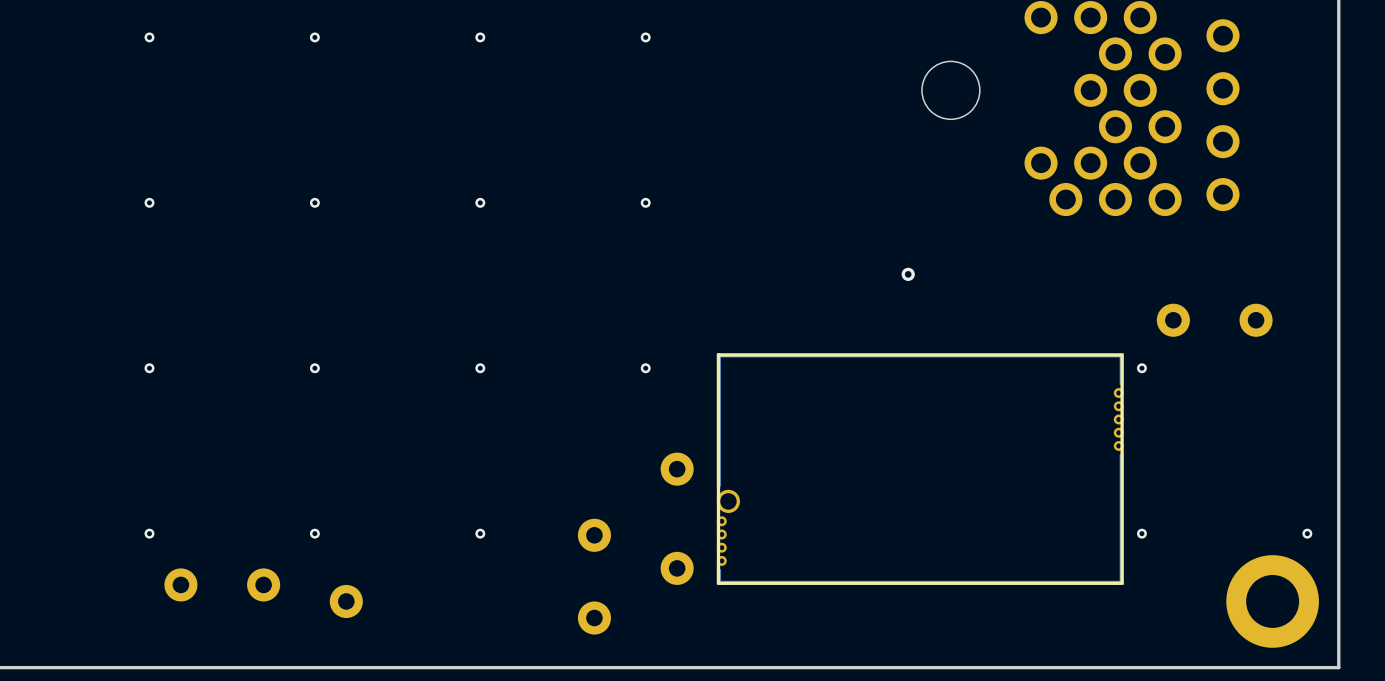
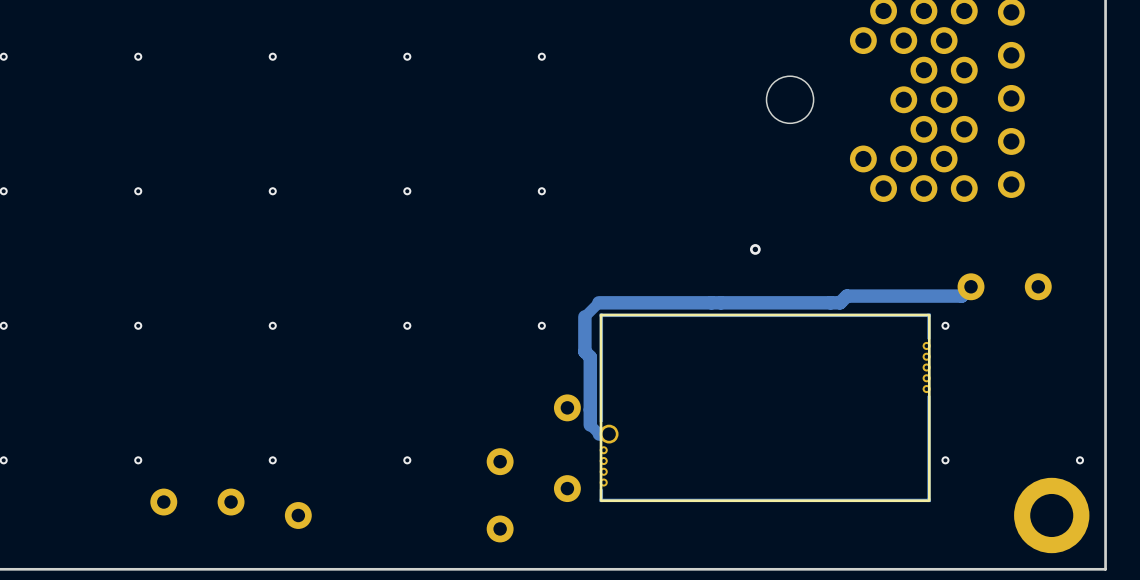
track: none -> (971, 286) (961, 296) (846, 296) (840, 302) (598, 302) (584, 316) (584, 351) (590, 357) (590, 425) (599, 434) (609, 434)

